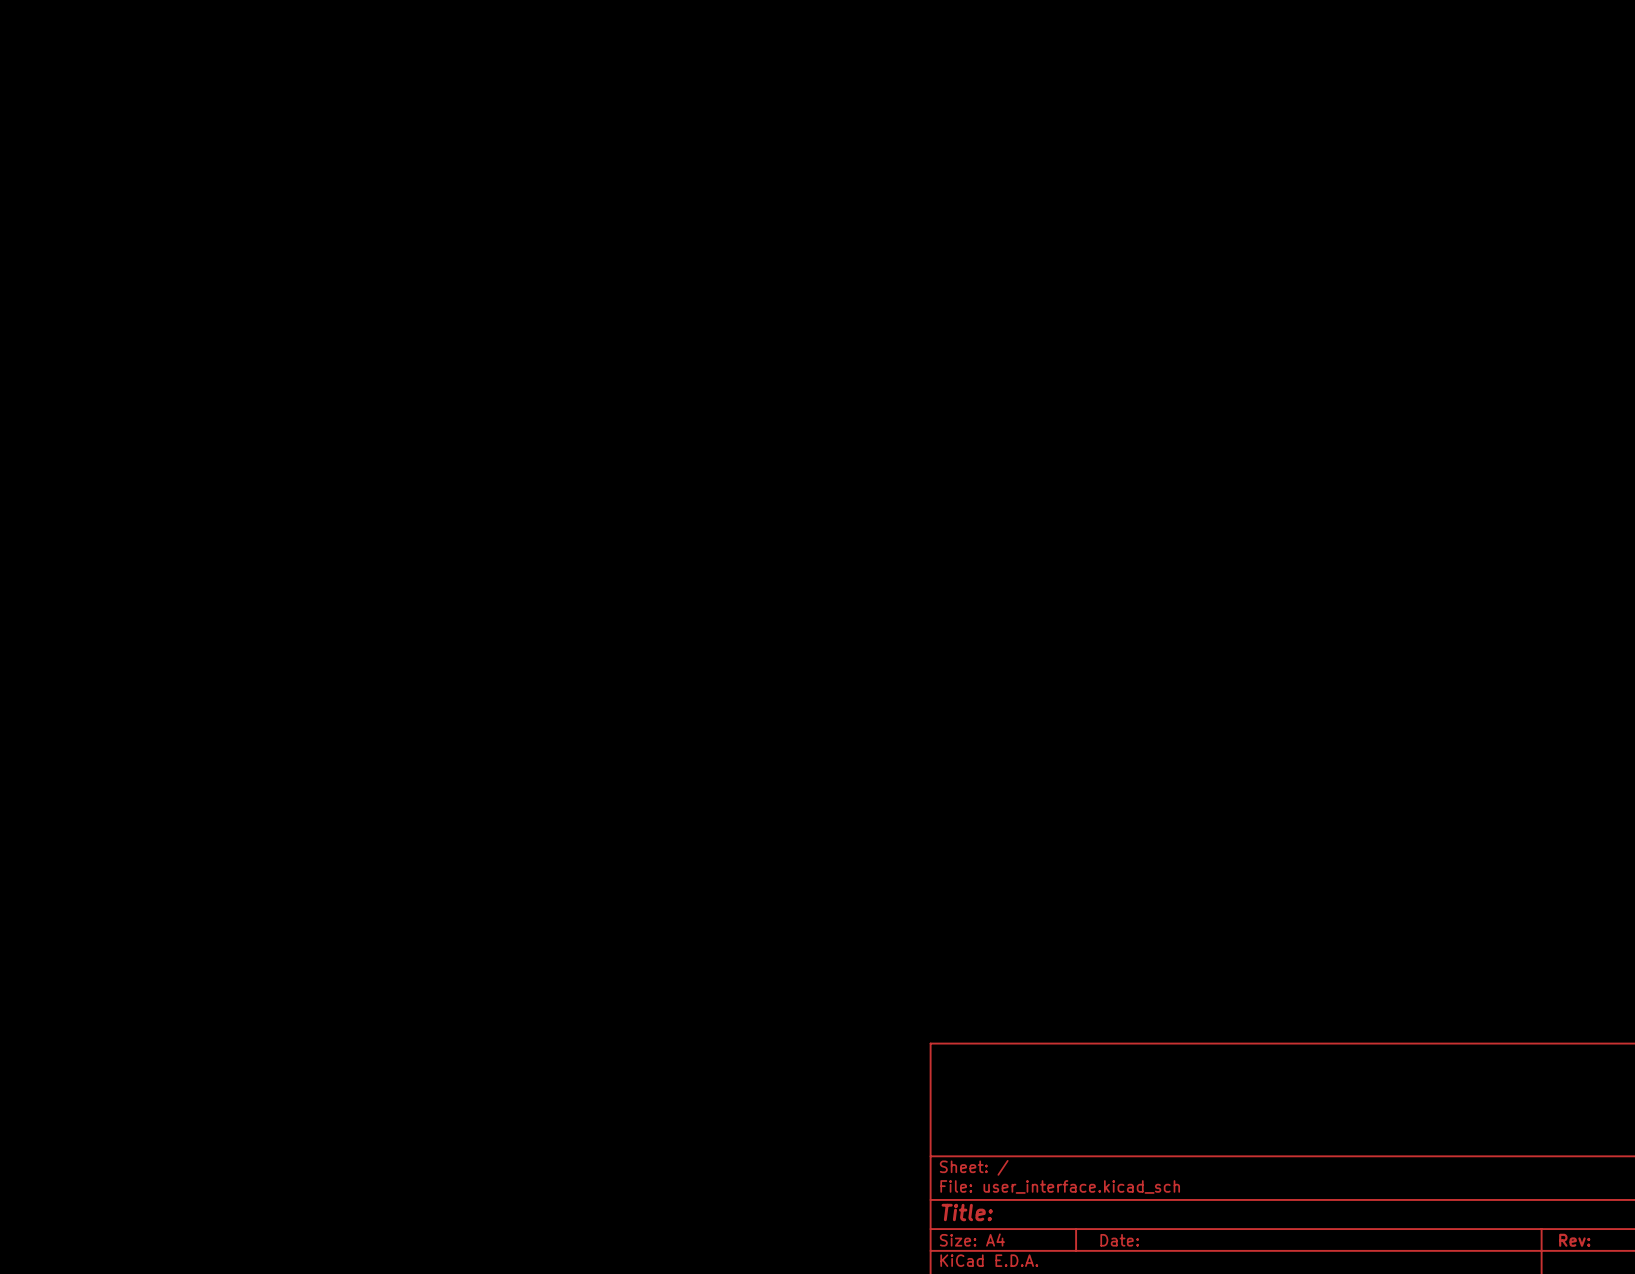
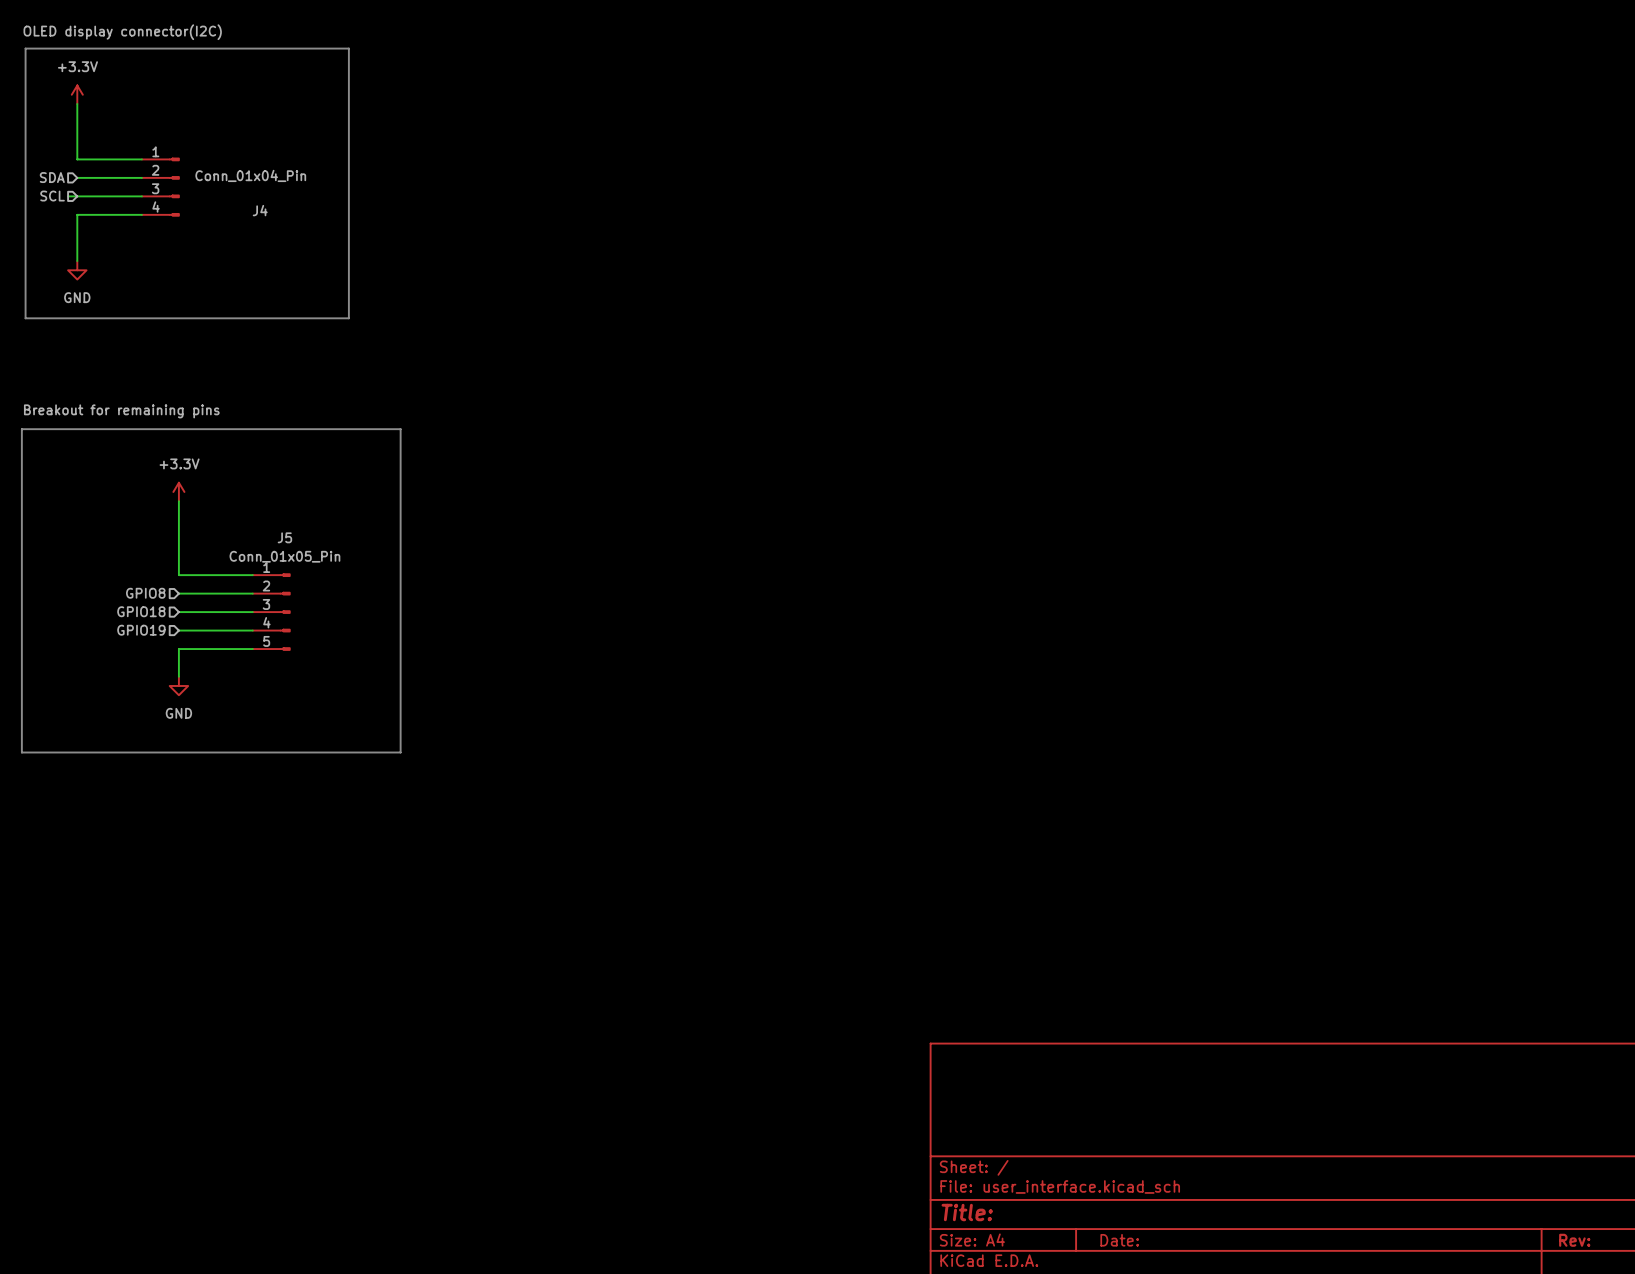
label: none -> OLED display connector(I2C) (122, 32)
line: none -> (25, 48) (348, 48) (348, 318) (25, 318) (25, 48)
power symbol: none -> +3.3V (77, 94)
wire: none -> (77, 104) (77, 159) (141, 159)
hierarchical label: none -> SDA (52, 177)
wire: none -> (77, 177) (141, 177)
J4: none -> Conn_01x04_Pin (160, 187)
hierarchical label: none -> SCL (52, 196)
wire: none -> (68, 196) (141, 196)
wire: none -> (141, 214) (77, 214) (77, 261)
power symbol: none -> GND (77, 270)
label: none -> Breakout for remaining pins (121, 411)
line: none -> (21, 429) (400, 429) (400, 752) (21, 752) (21, 429)
power symbol: none -> +3.3V (178, 491)
wire: none -> (178, 501) (178, 575) (252, 575)
hierarchical label: none -> GPIO8 (145, 593)
wire: none -> (178, 593) (252, 593)
hierarchical label: none -> GPIO18 (141, 611)
wire: none -> (178, 612) (252, 612)
J5: none -> Conn_01x05_Pin (271, 612)
hierarchical label: none -> GPIO19 (141, 630)
wire: none -> (178, 630) (252, 630)
wire: none -> (252, 649) (178, 649) (178, 676)
power symbol: none -> GND (178, 685)

